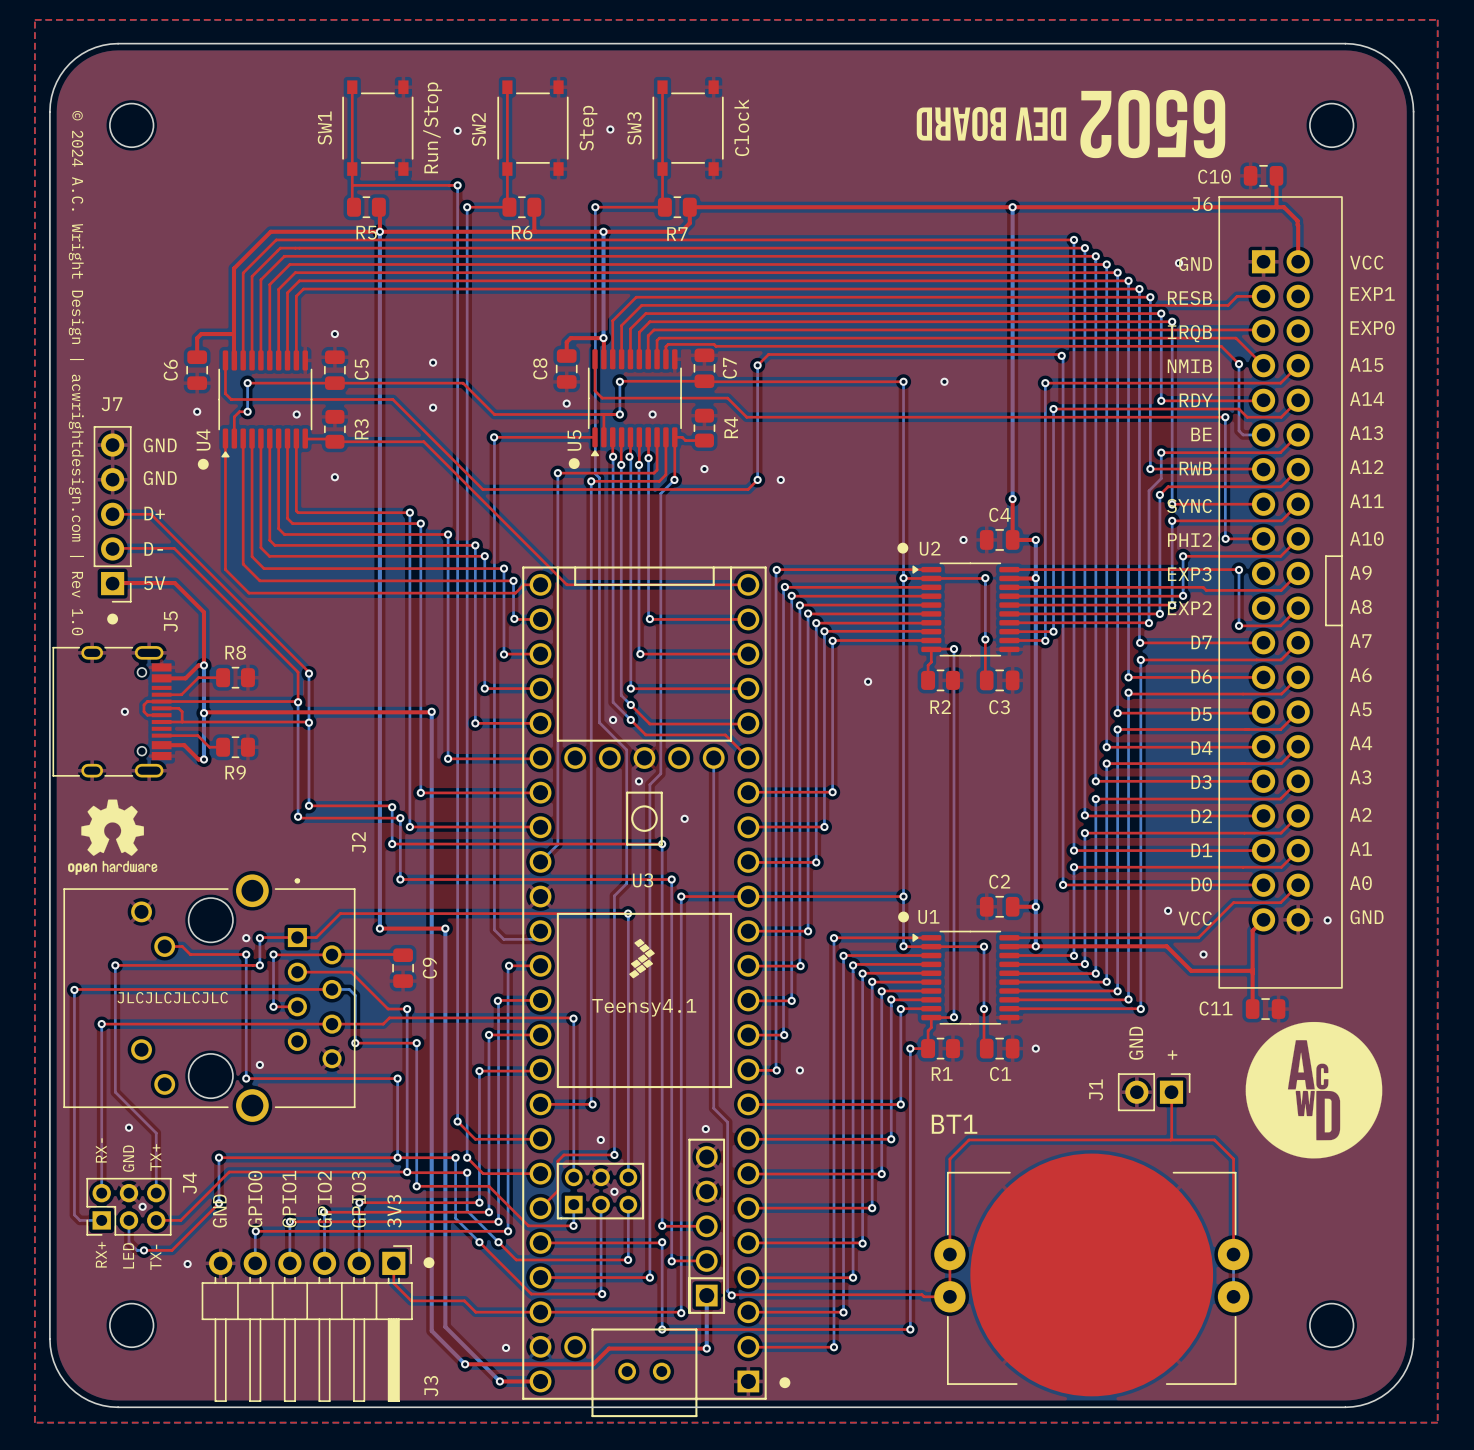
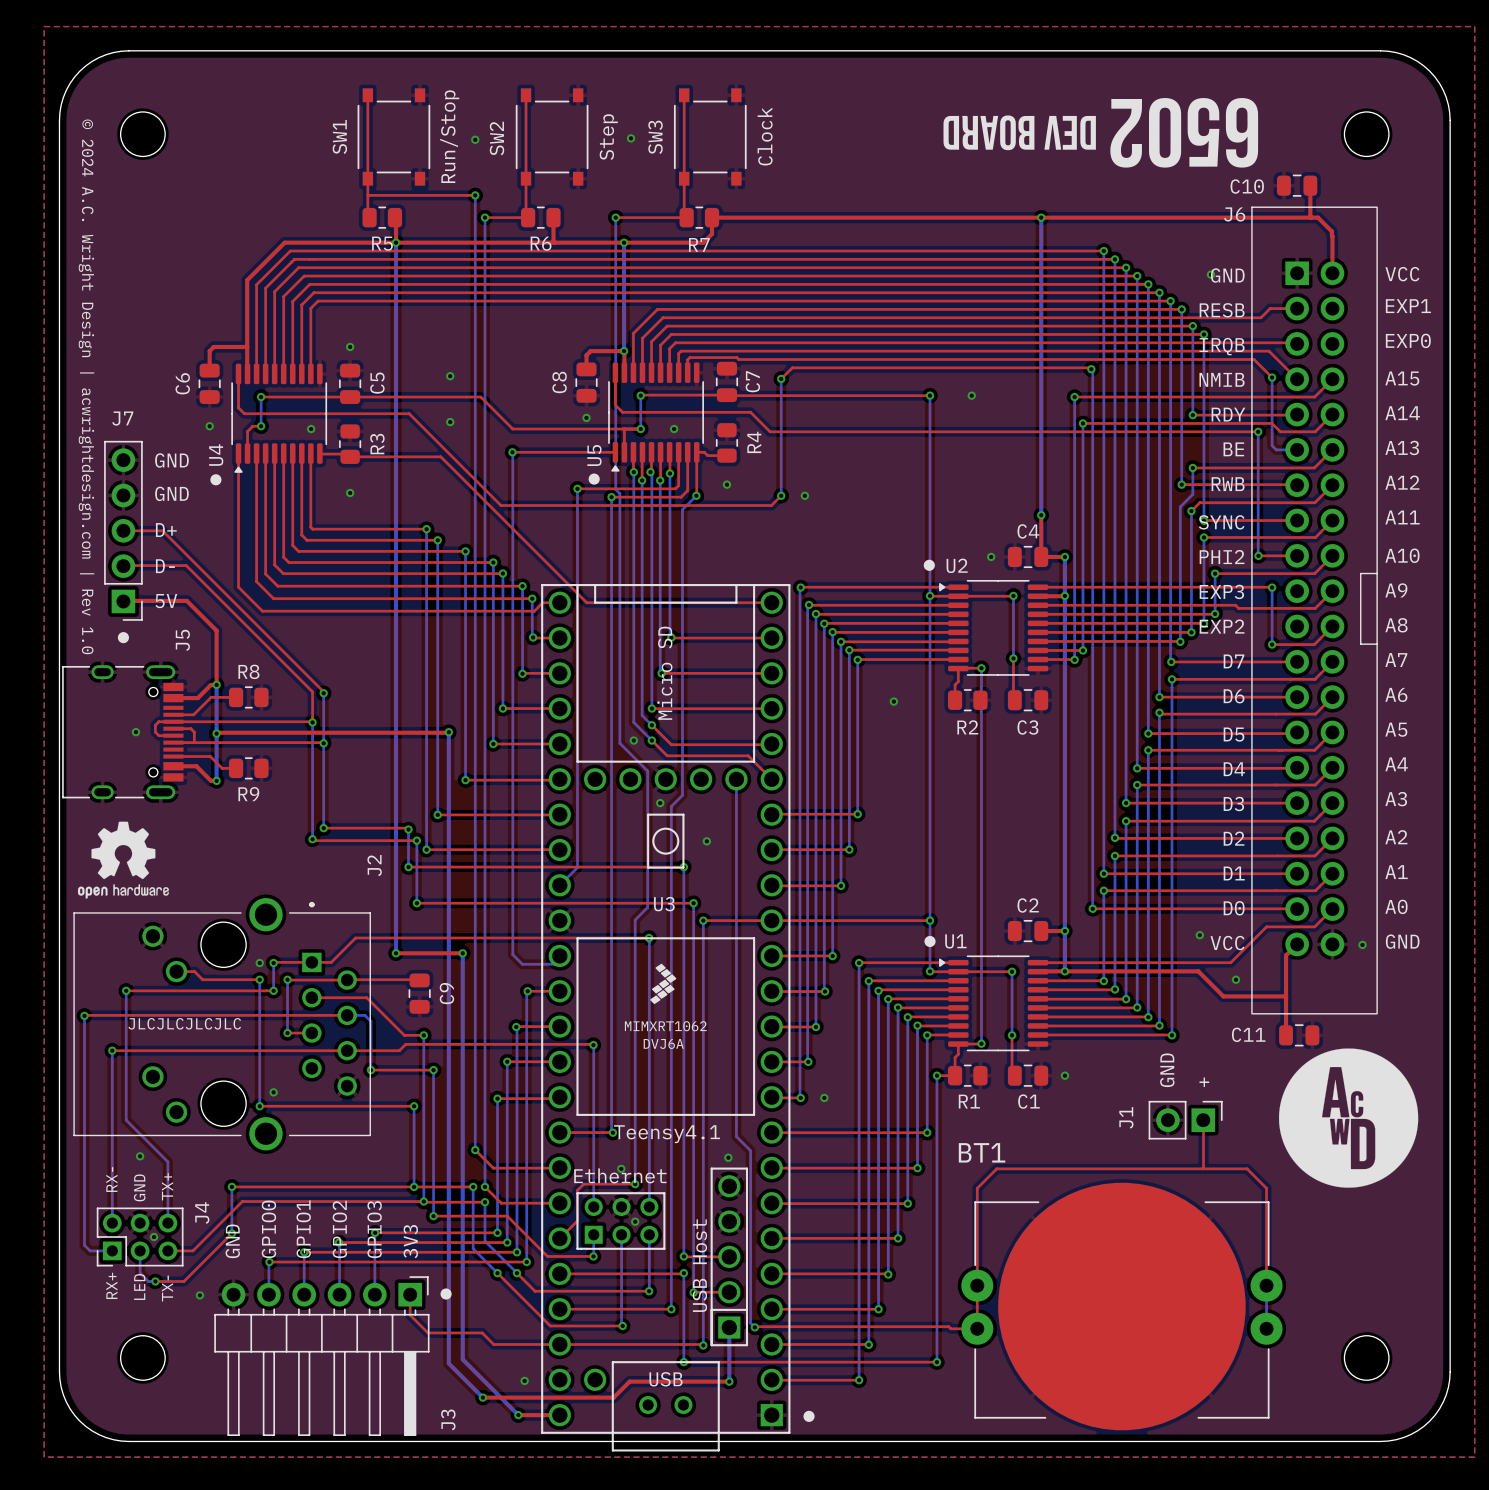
U3 text: none -> Micro SD (664, 673)
U3 text: none -> MIMXRT1062 (665, 1026)
U3 value position: Teensy4.1 (644, 1007) -> Teensy4.1 (666, 1134)
U3 text: none -> DVJ6A (663, 1043)
U3 text: none -> Ethernet (620, 1175)
U3 text: none -> USB Host (699, 1265)
U3 text: none -> USB (666, 1379)

